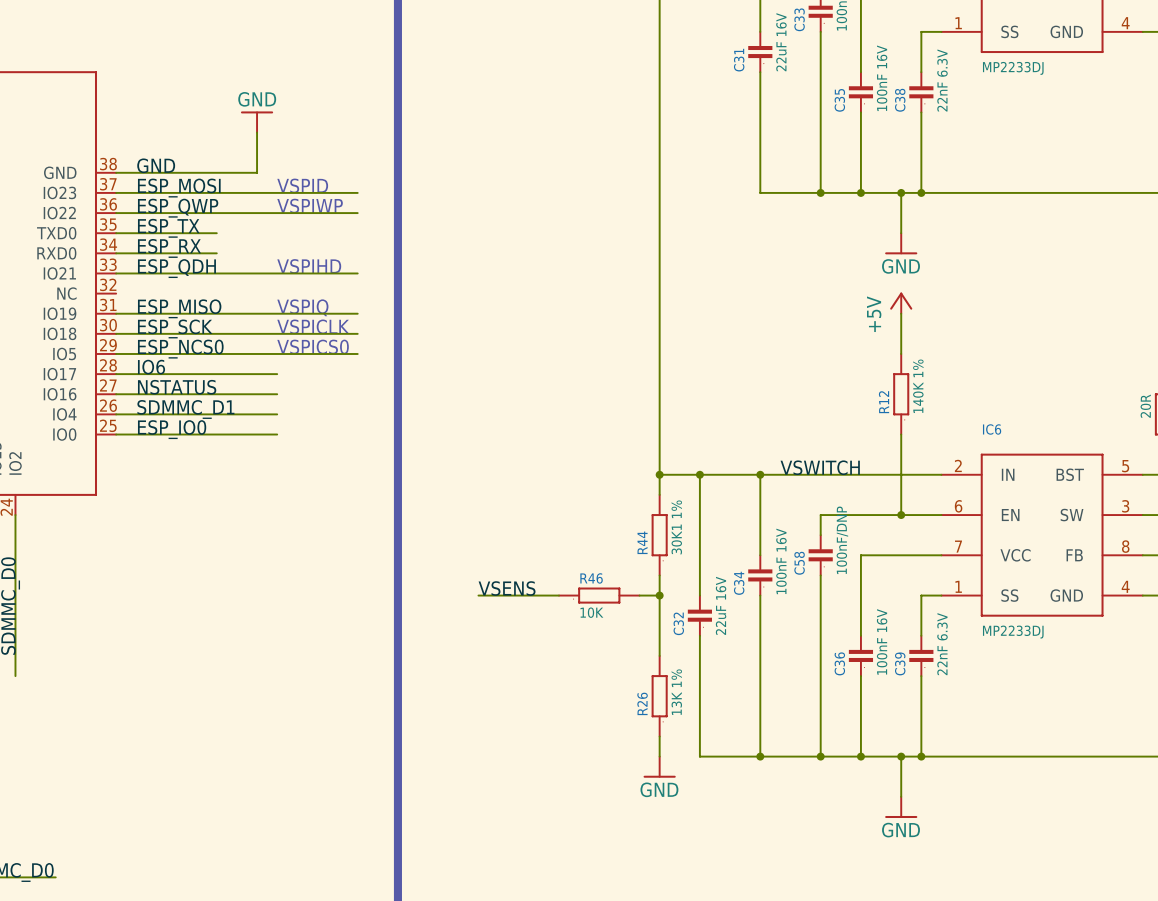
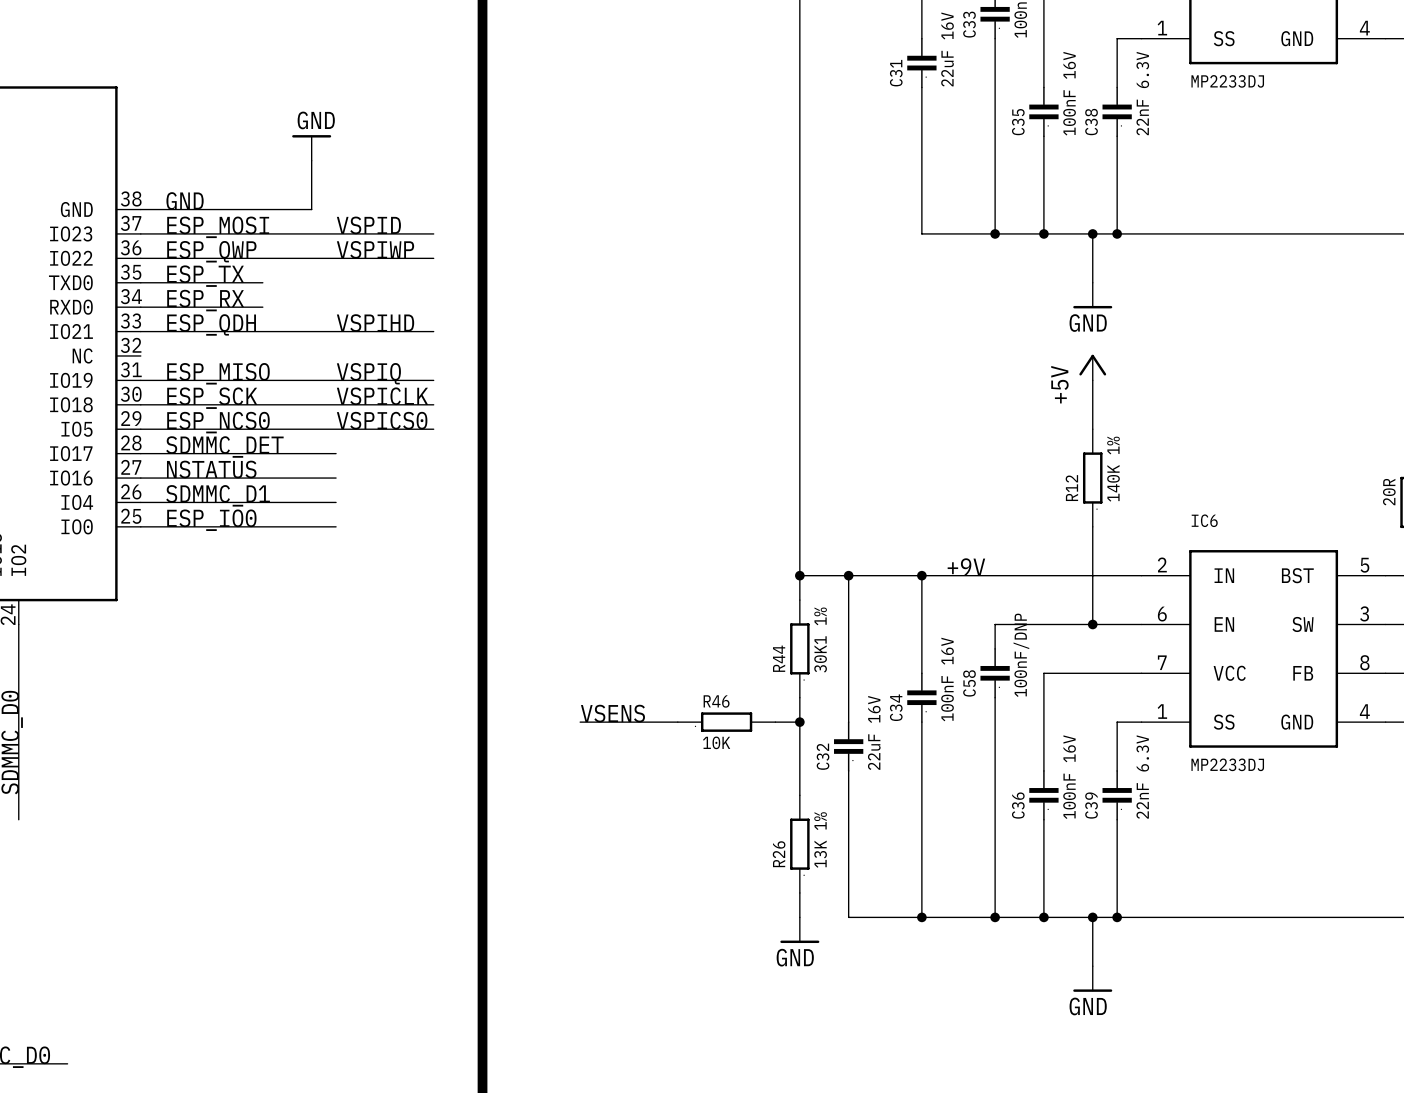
label: IO6 (151, 367) -> SDMMC_DET (224, 447)
label: VSWITCH (820, 467) -> +9V (966, 566)

